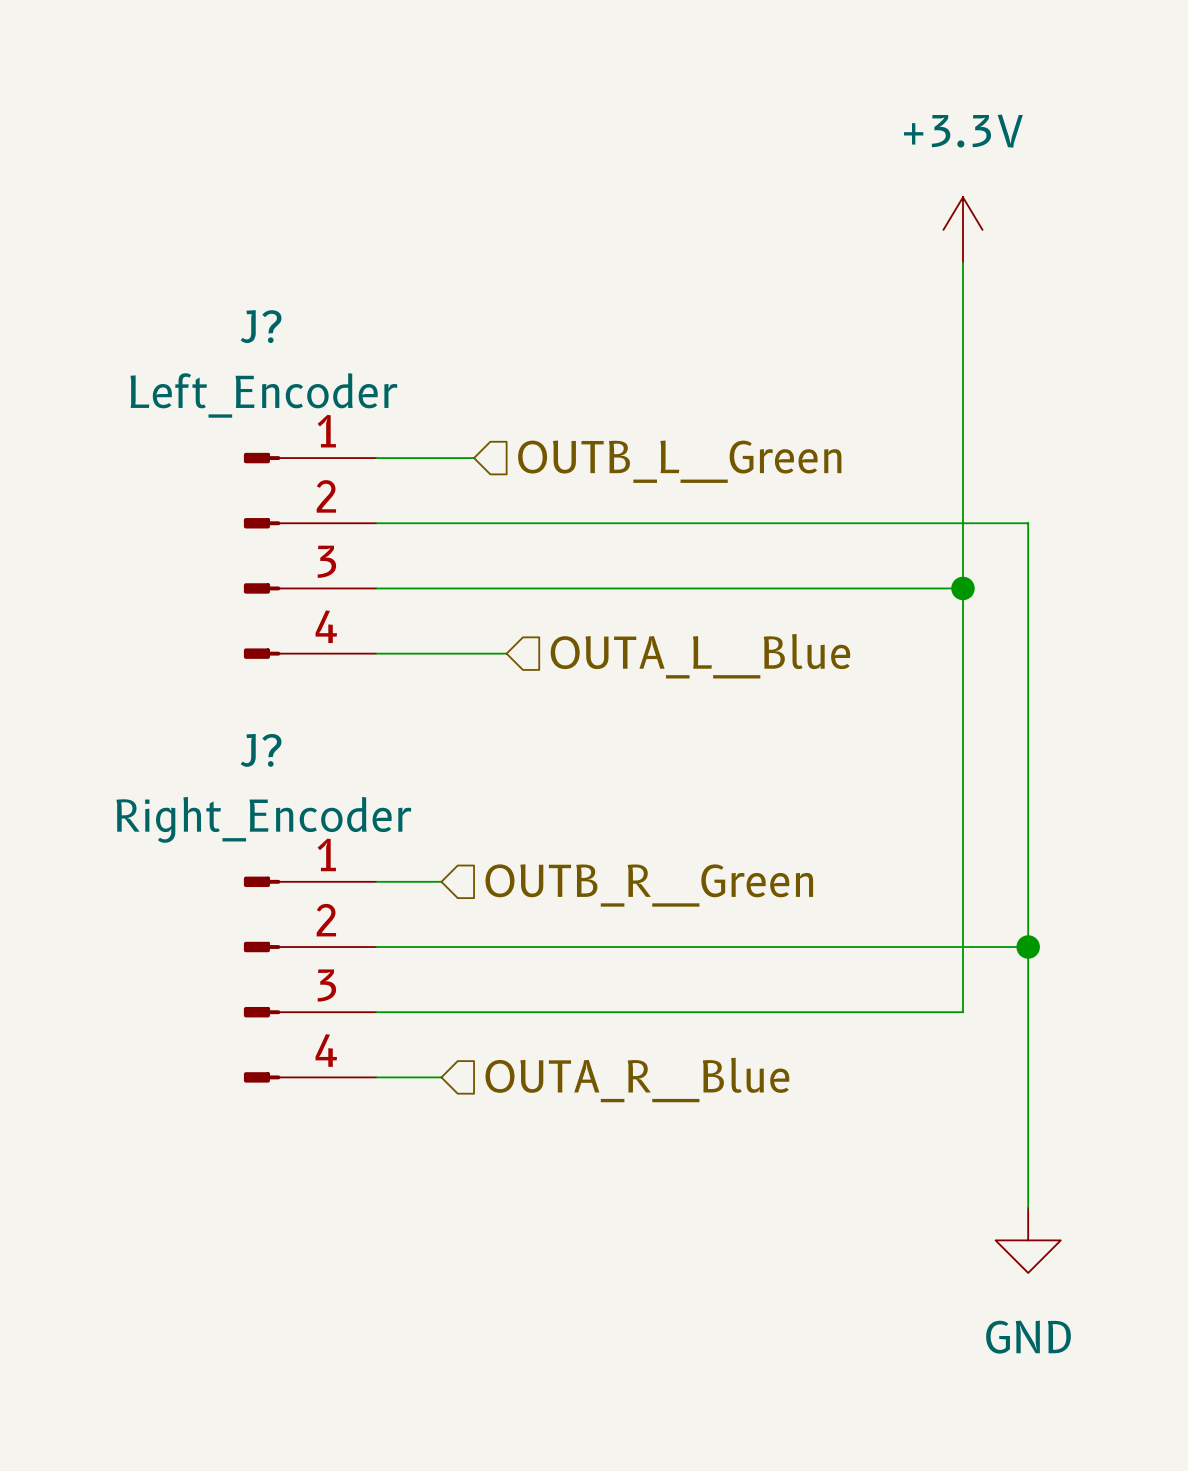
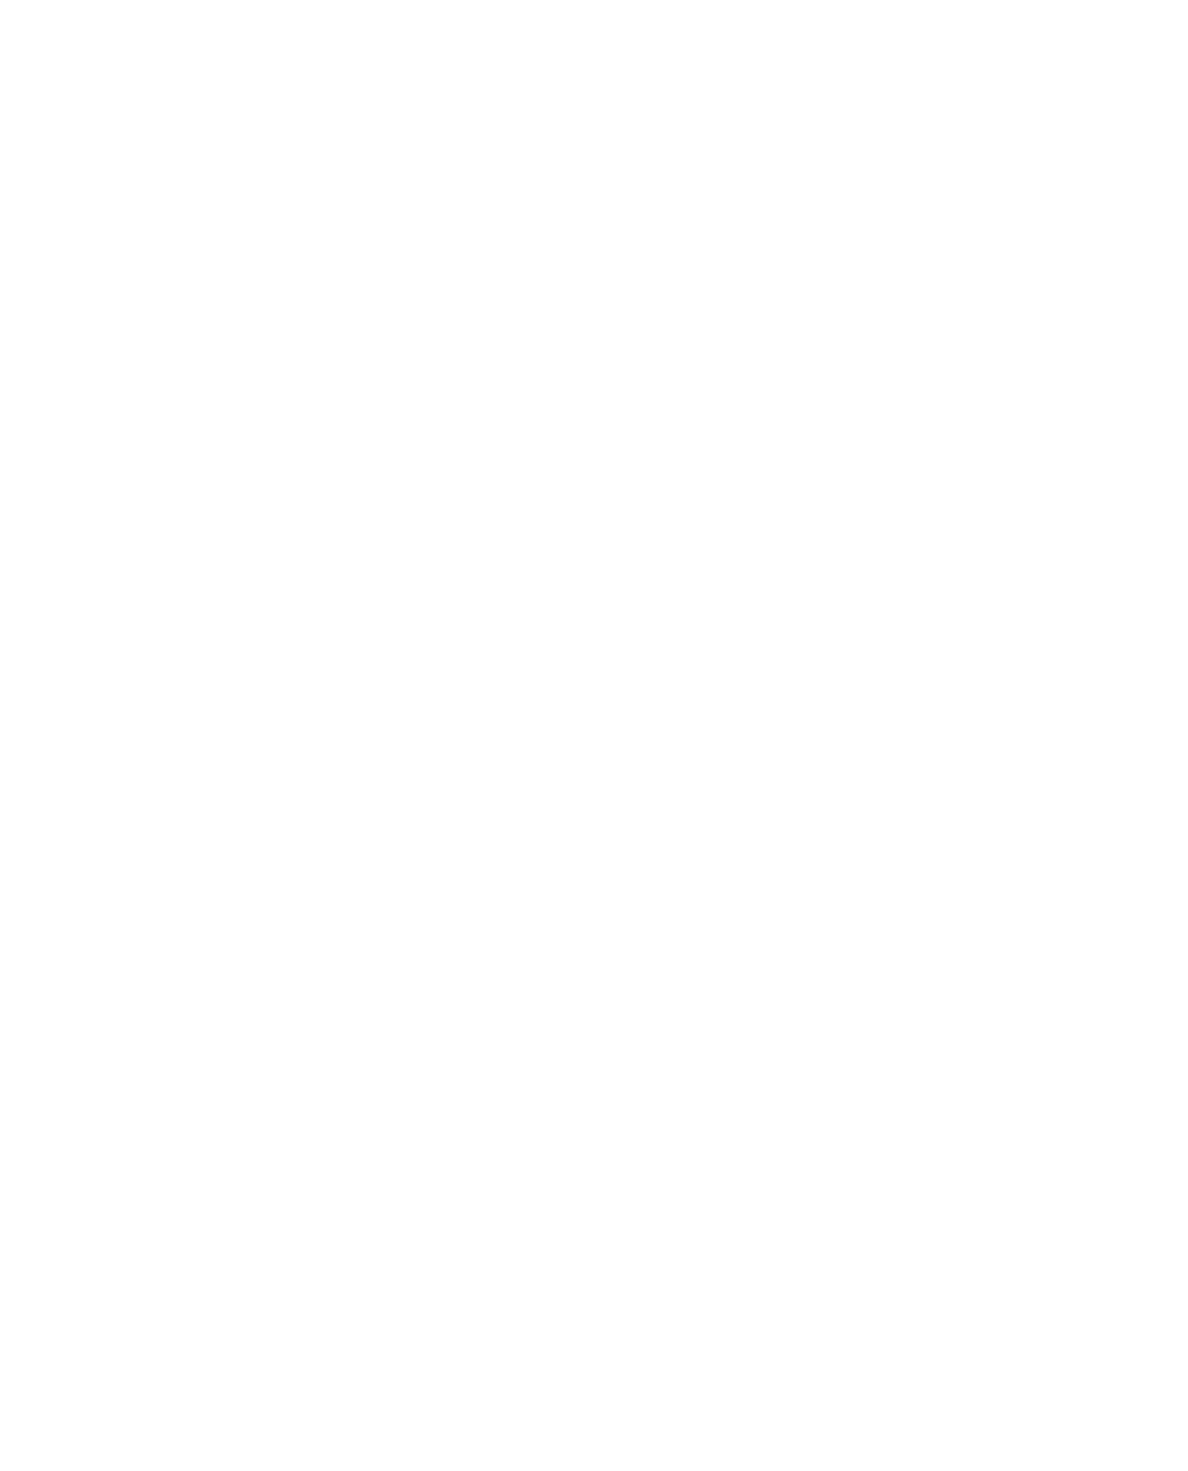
power symbol: +3.3V (962, 229) -> none
wire: (962, 262) (962, 1012) (376, 1012) -> none
wire: (376, 458) (474, 458) -> none
hierarchical label: OUTB_L__Green (679, 461) -> none
wire: (376, 523) (1028, 523) (1028, 1207) -> none
J?: Left_Encoder (310, 555) -> none
wire: (376, 588) (962, 588) -> none
junction: (962, 588) -> none
wire: (376, 653) (506, 653) -> none
hierarchical label: OUTA_L__Blue (700, 656) -> none
wire: (376, 881) (441, 881) -> none
hierarchical label: OUTB_R__Green (649, 885) -> none
wire: (376, 947) (1028, 947) -> none
junction: (1028, 947) -> none
J?: Right_Encoder (310, 979) -> none
wire: (376, 1077) (441, 1077) -> none
hierarchical label: OUTA_R__Blue (637, 1079) -> none
power symbol: GND (1028, 1240) -> none

